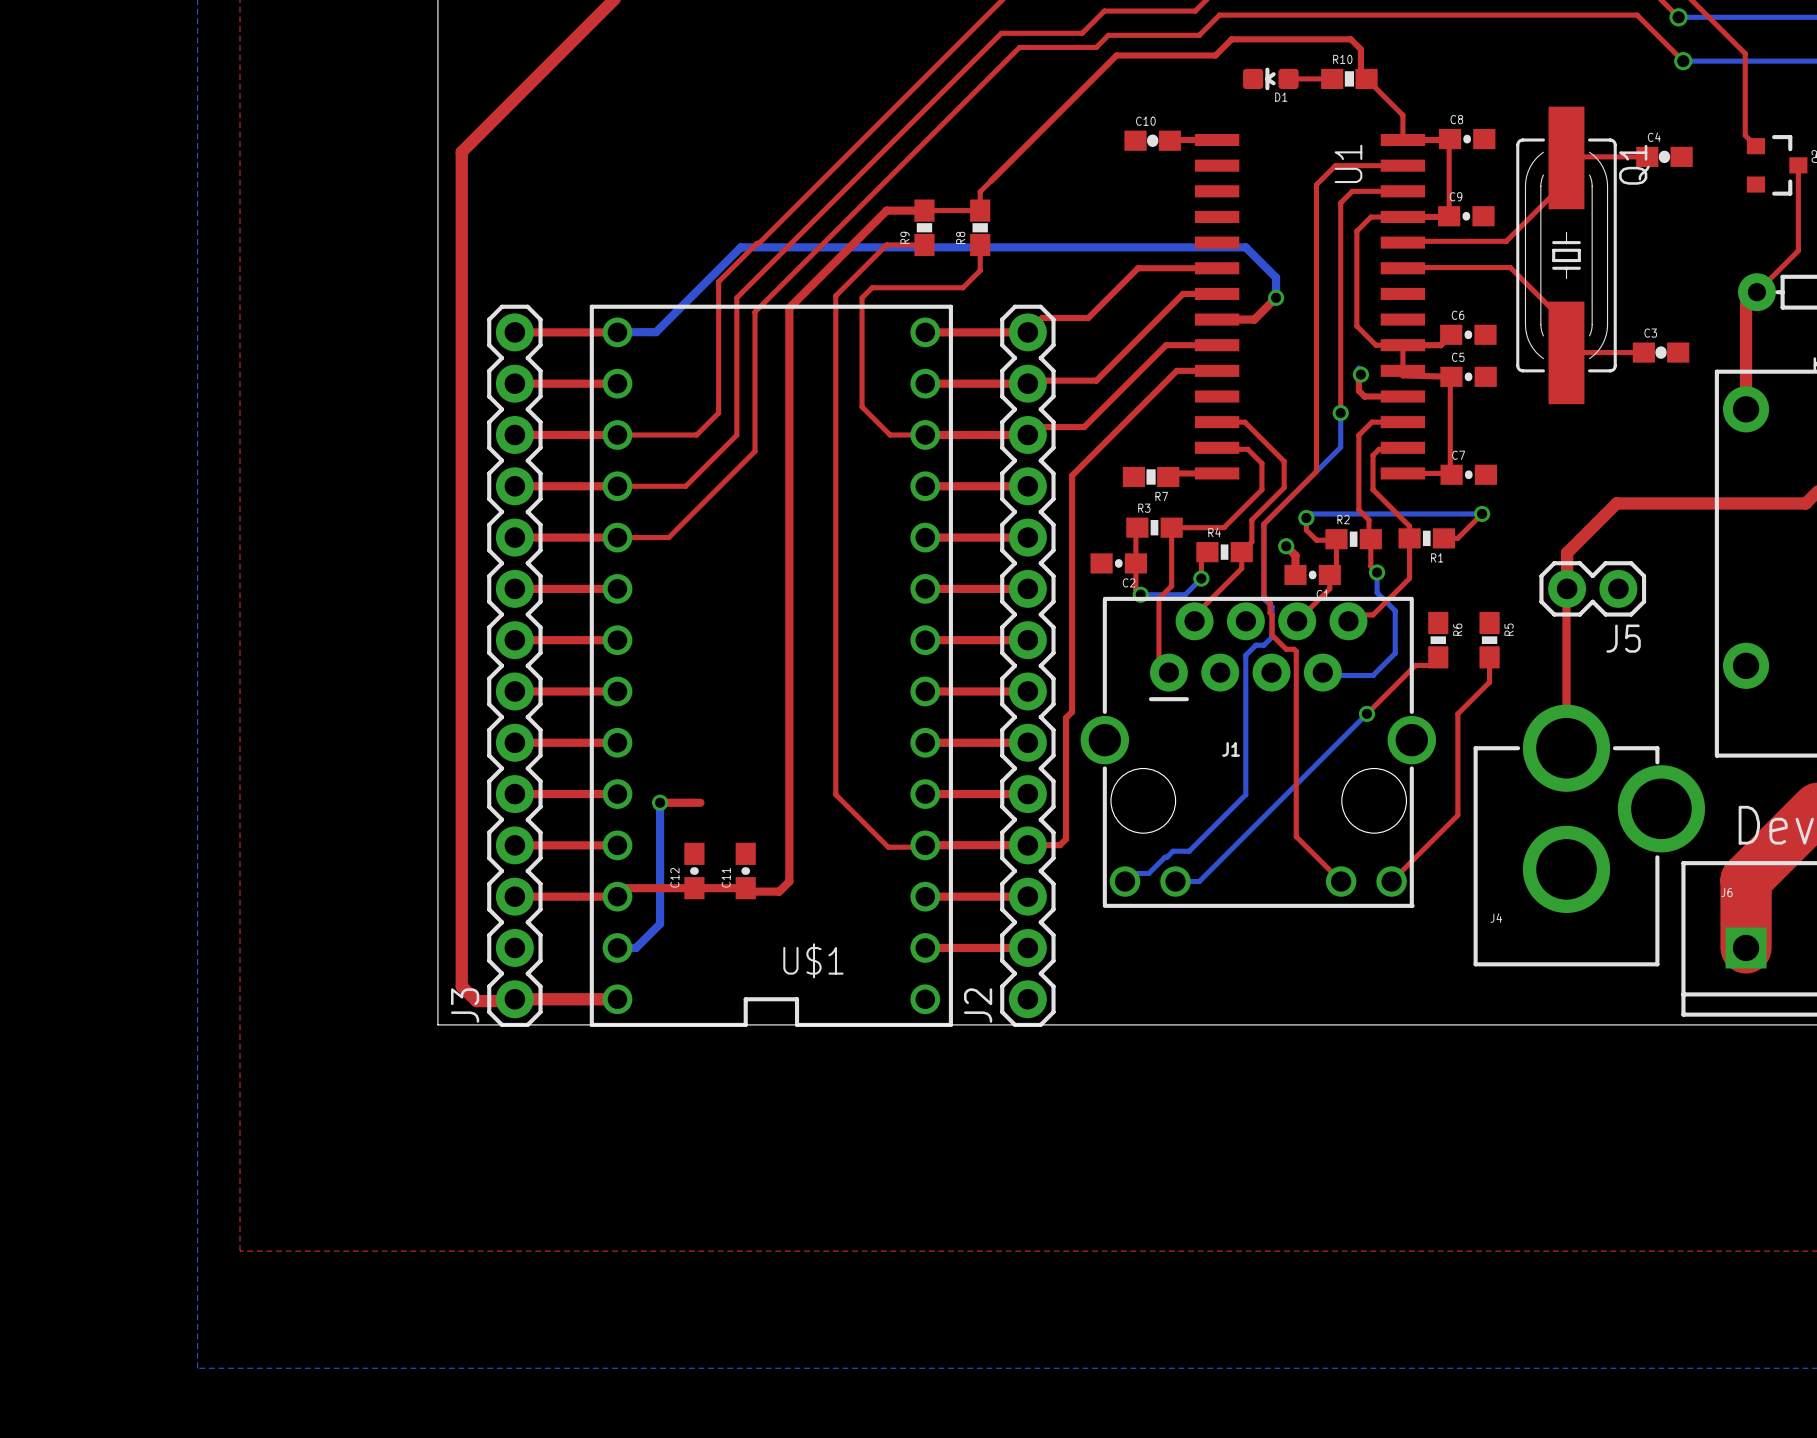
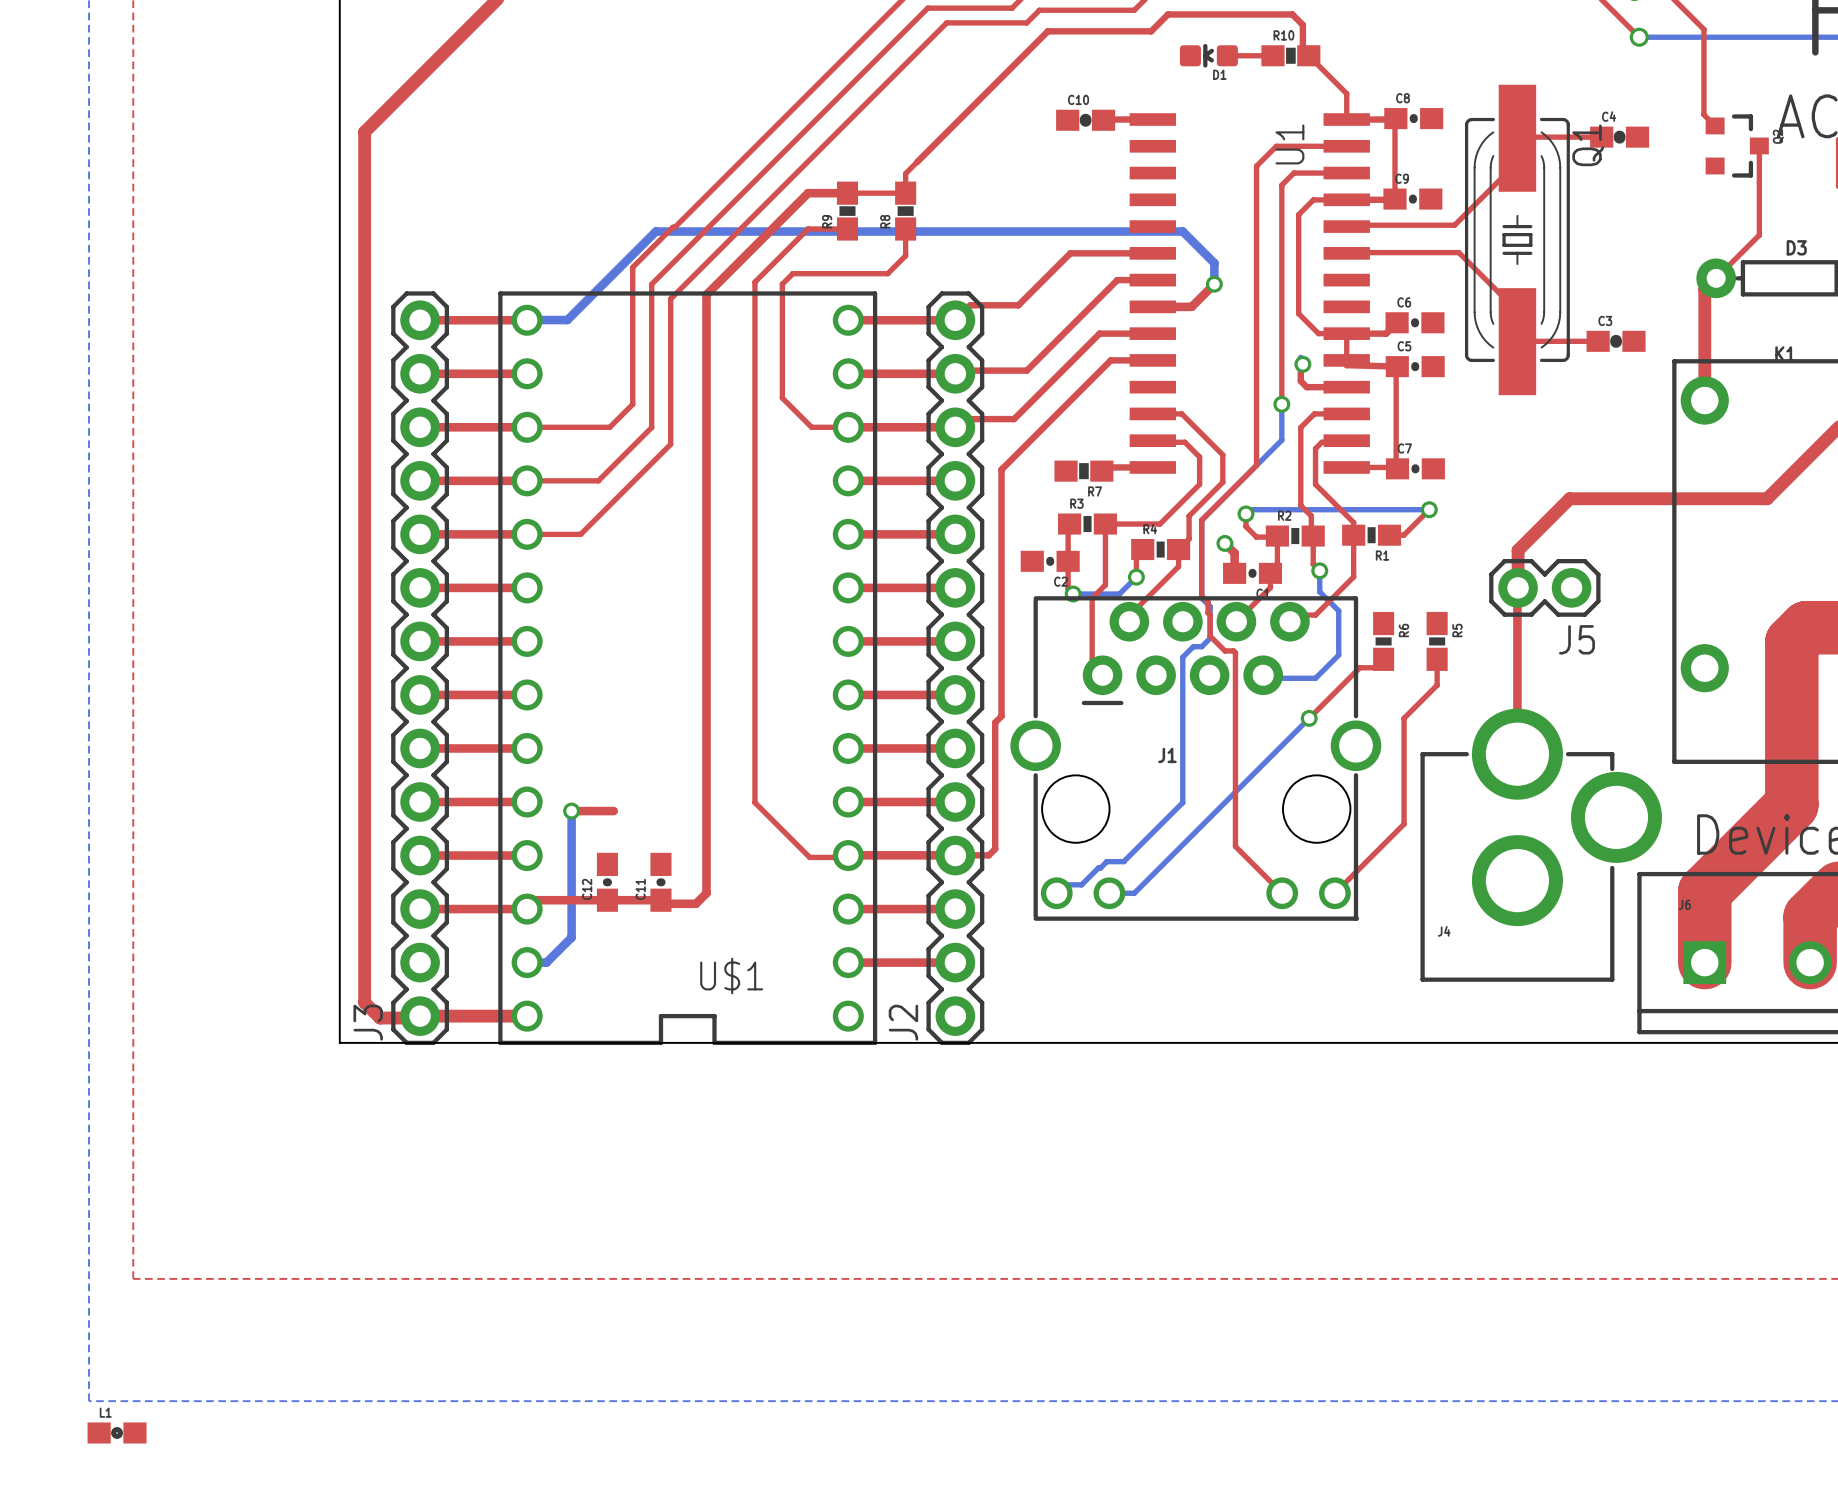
L1: none -> (117, 1432)

